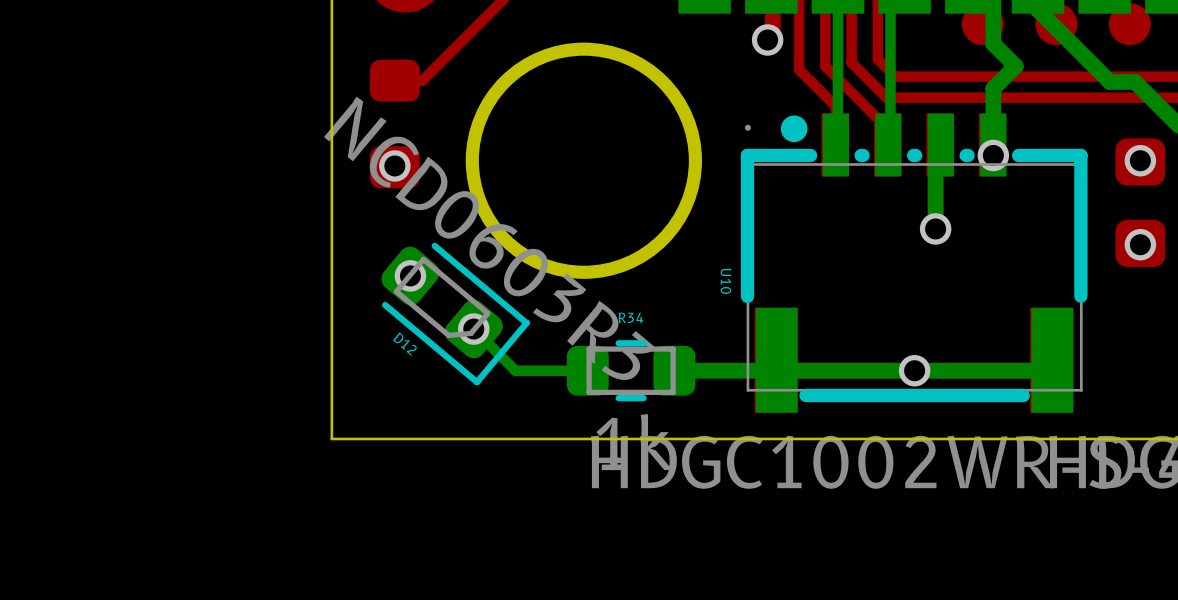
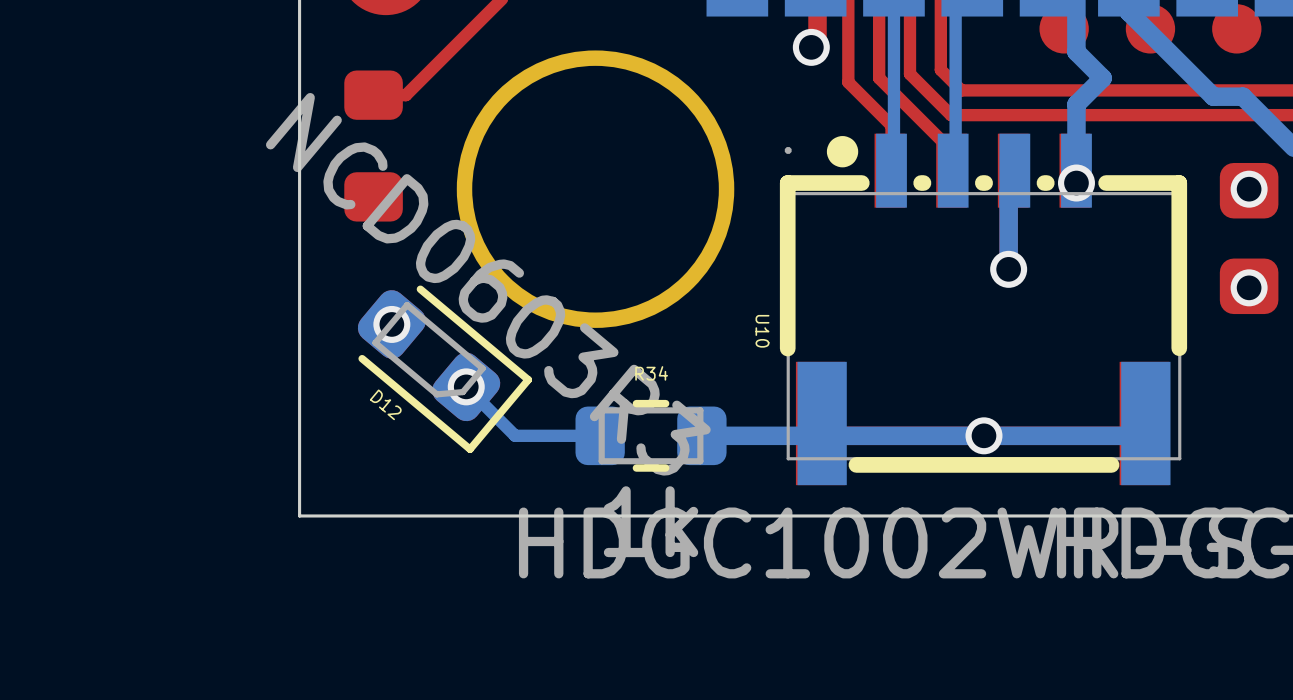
via: (394, 165) -> none

